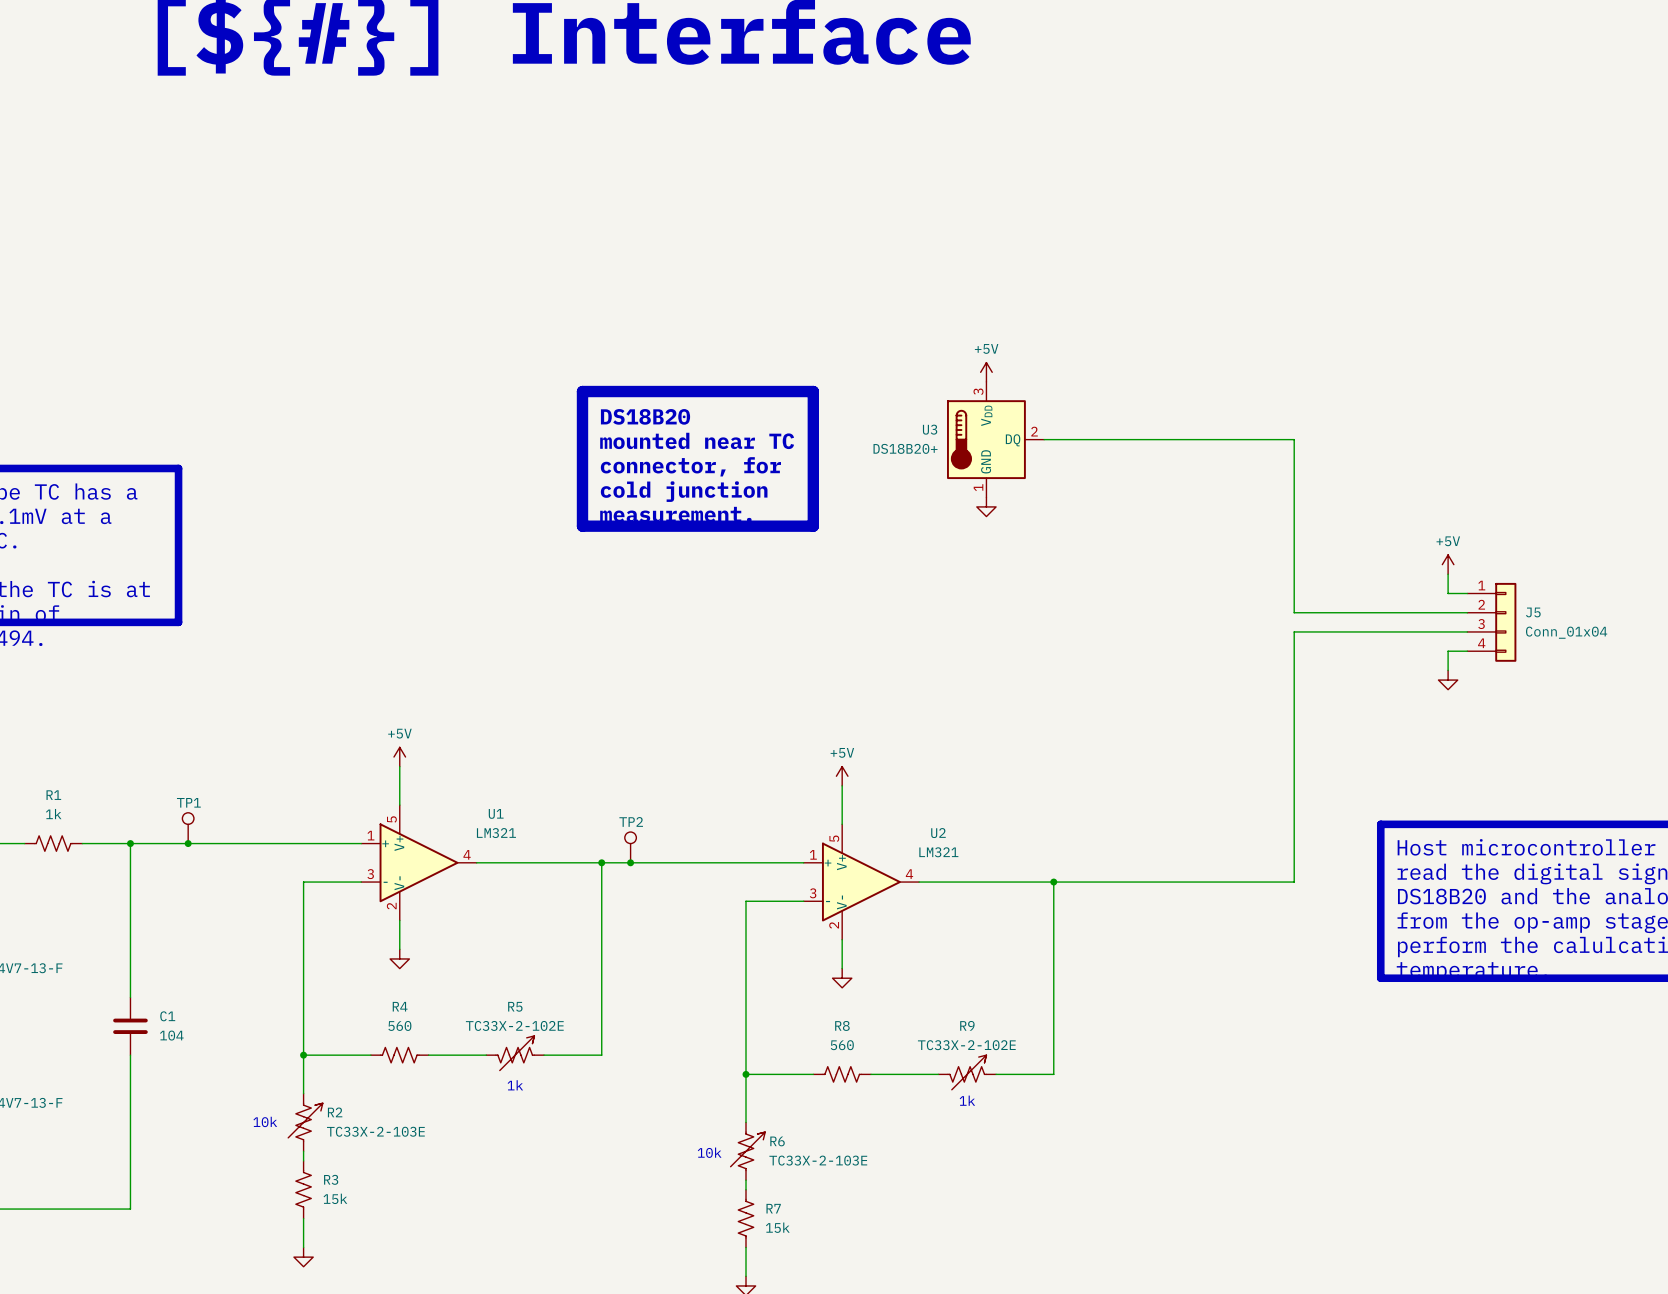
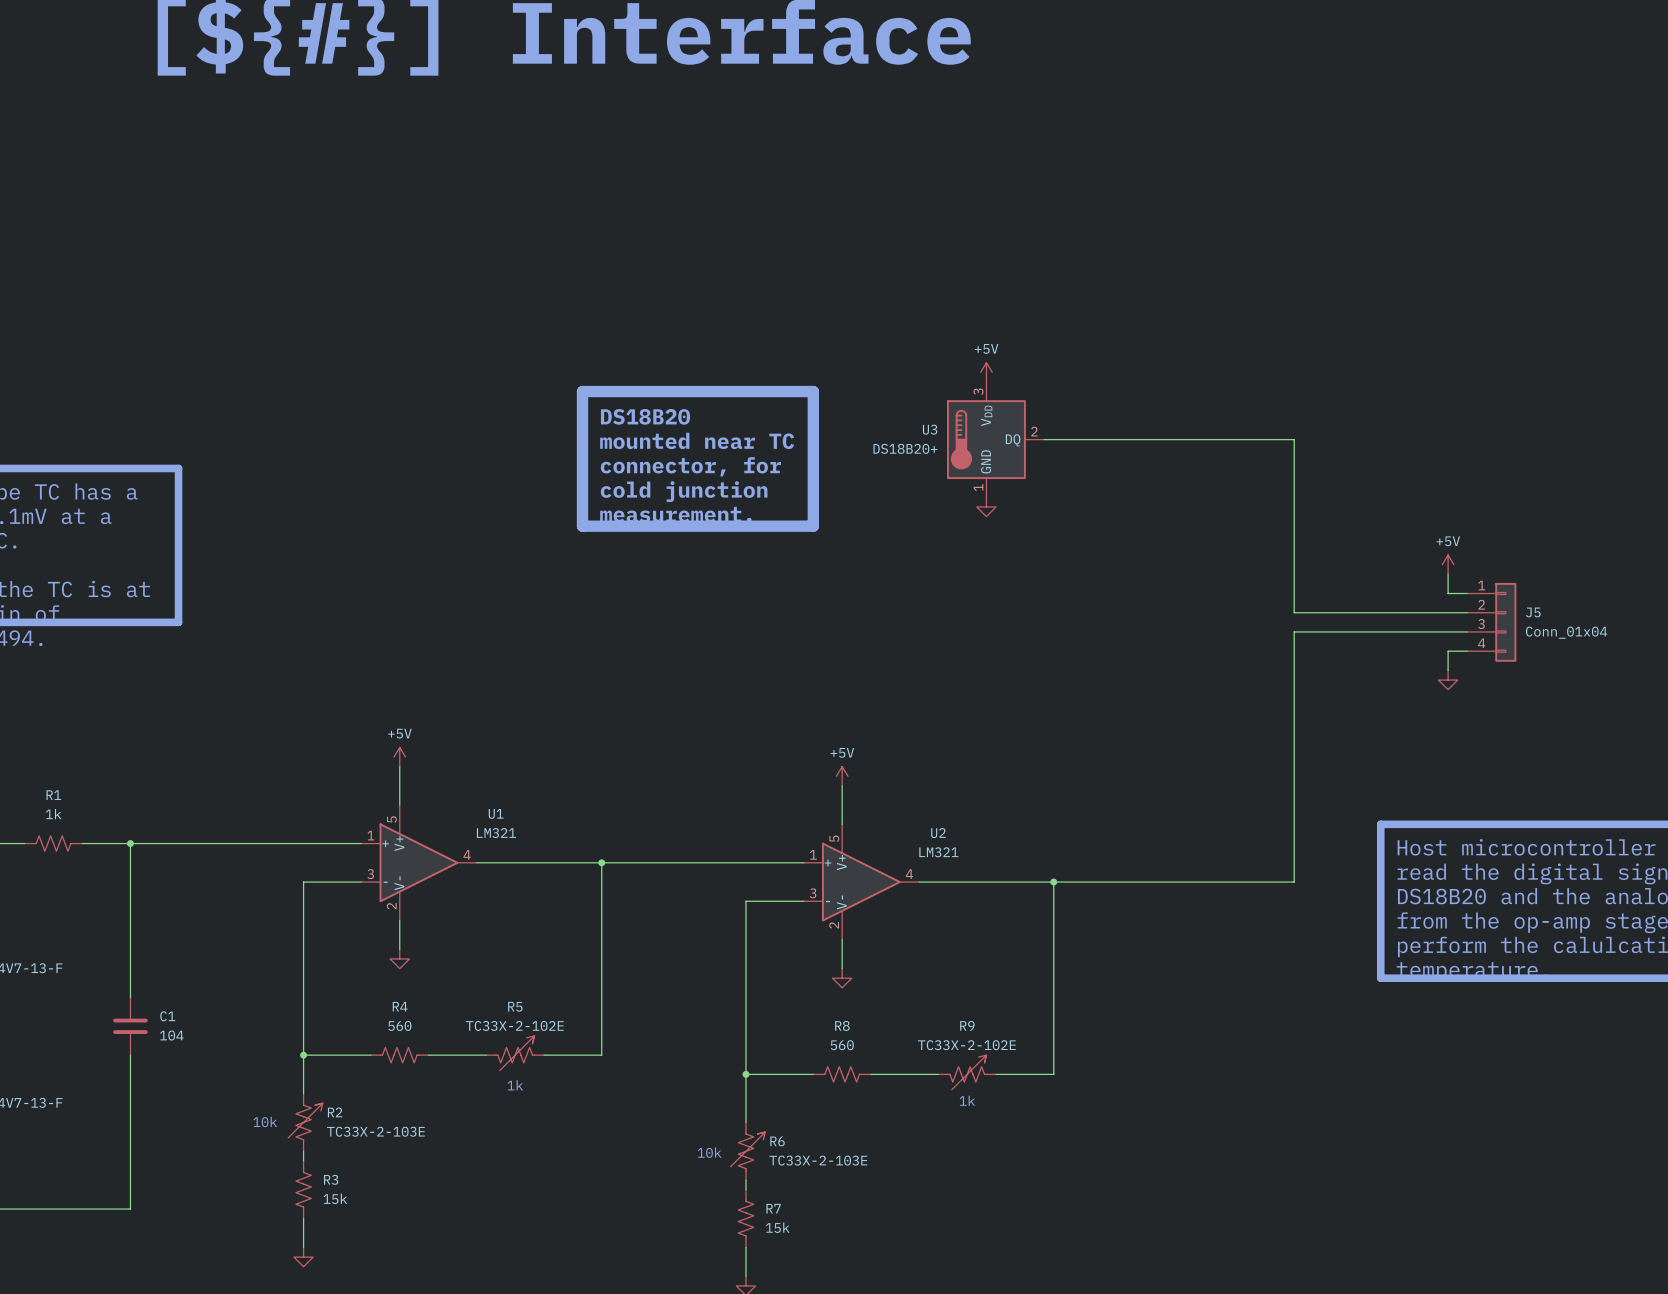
TP1: (188, 828) -> none
junction: (188, 843) -> none
TP2: (630, 847) -> none
junction: (630, 862) -> none

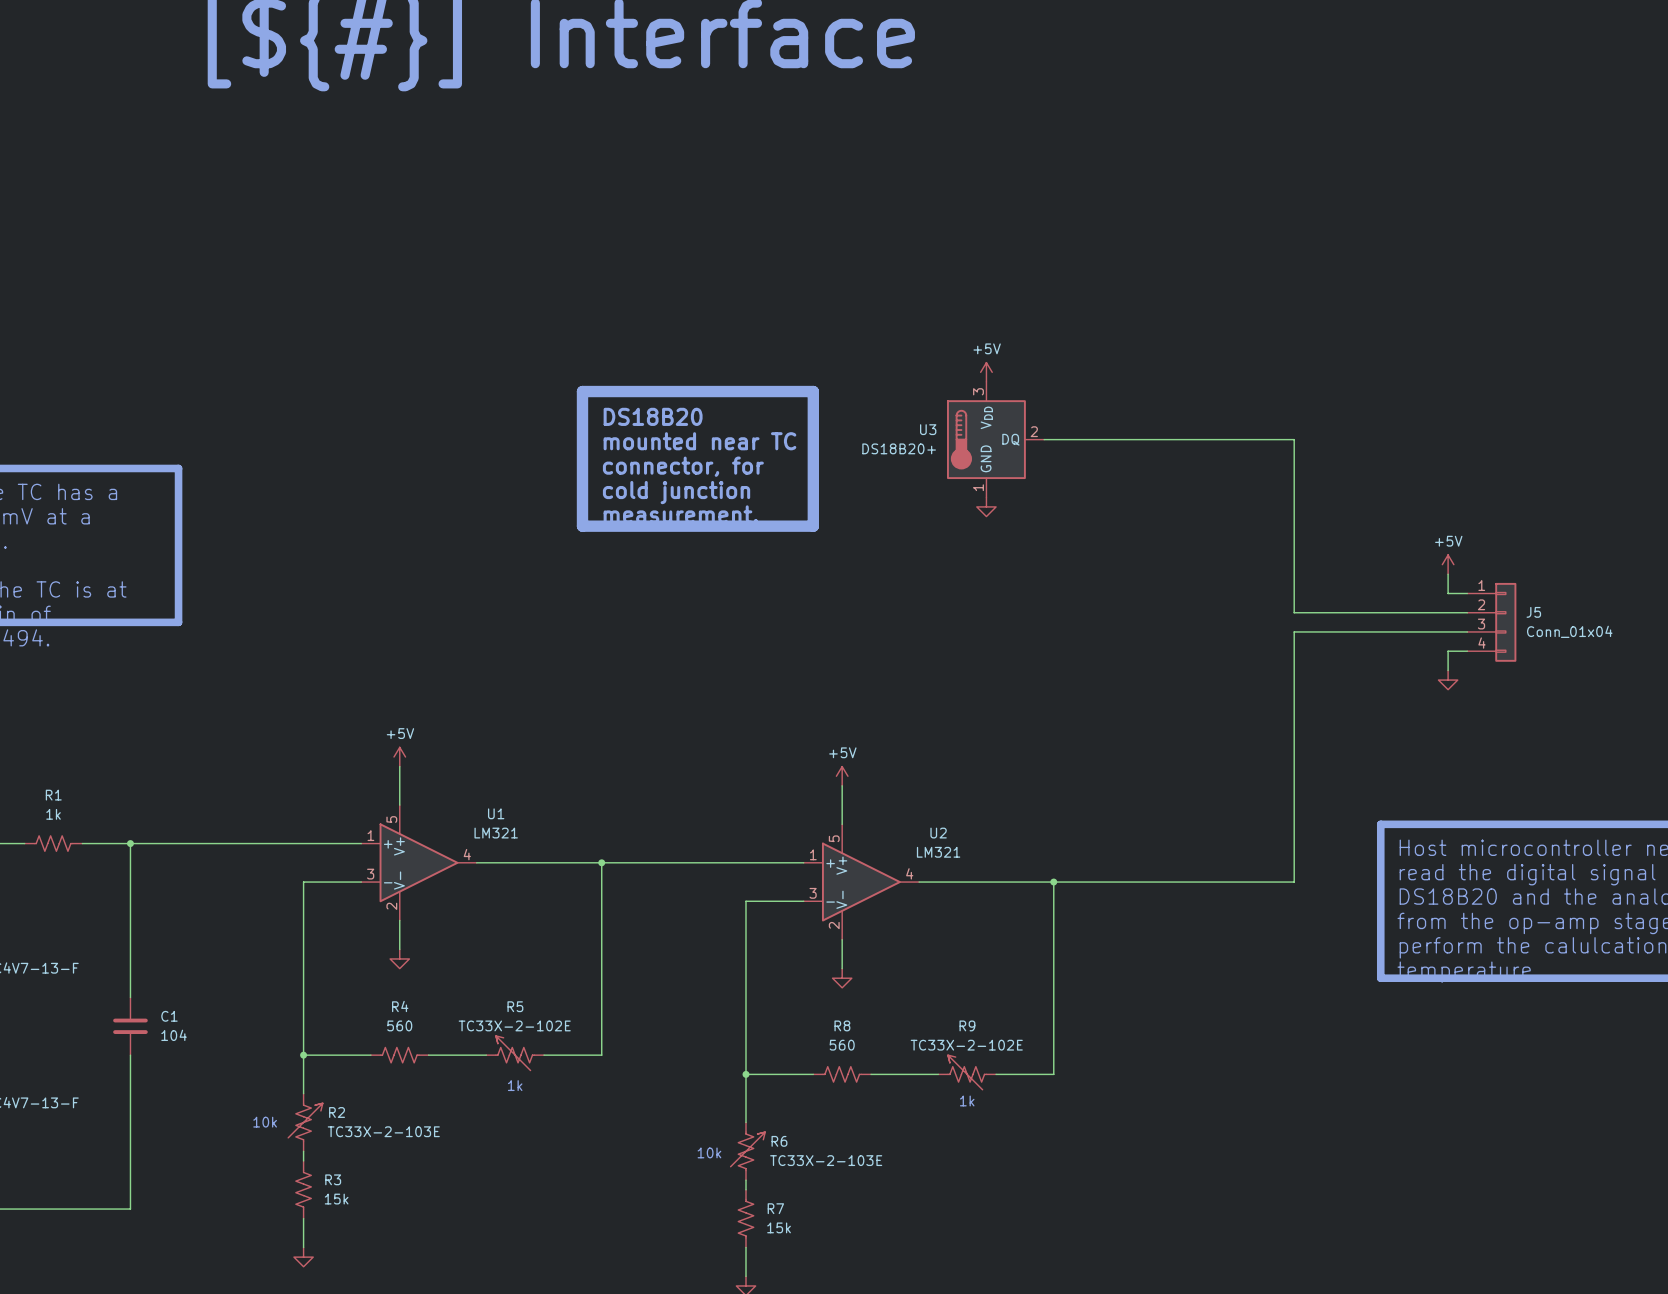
R5 flip: as is (515, 1053) -> left-right (514, 1053)
R9 flip: as is (967, 1072) -> left-right (966, 1072)

